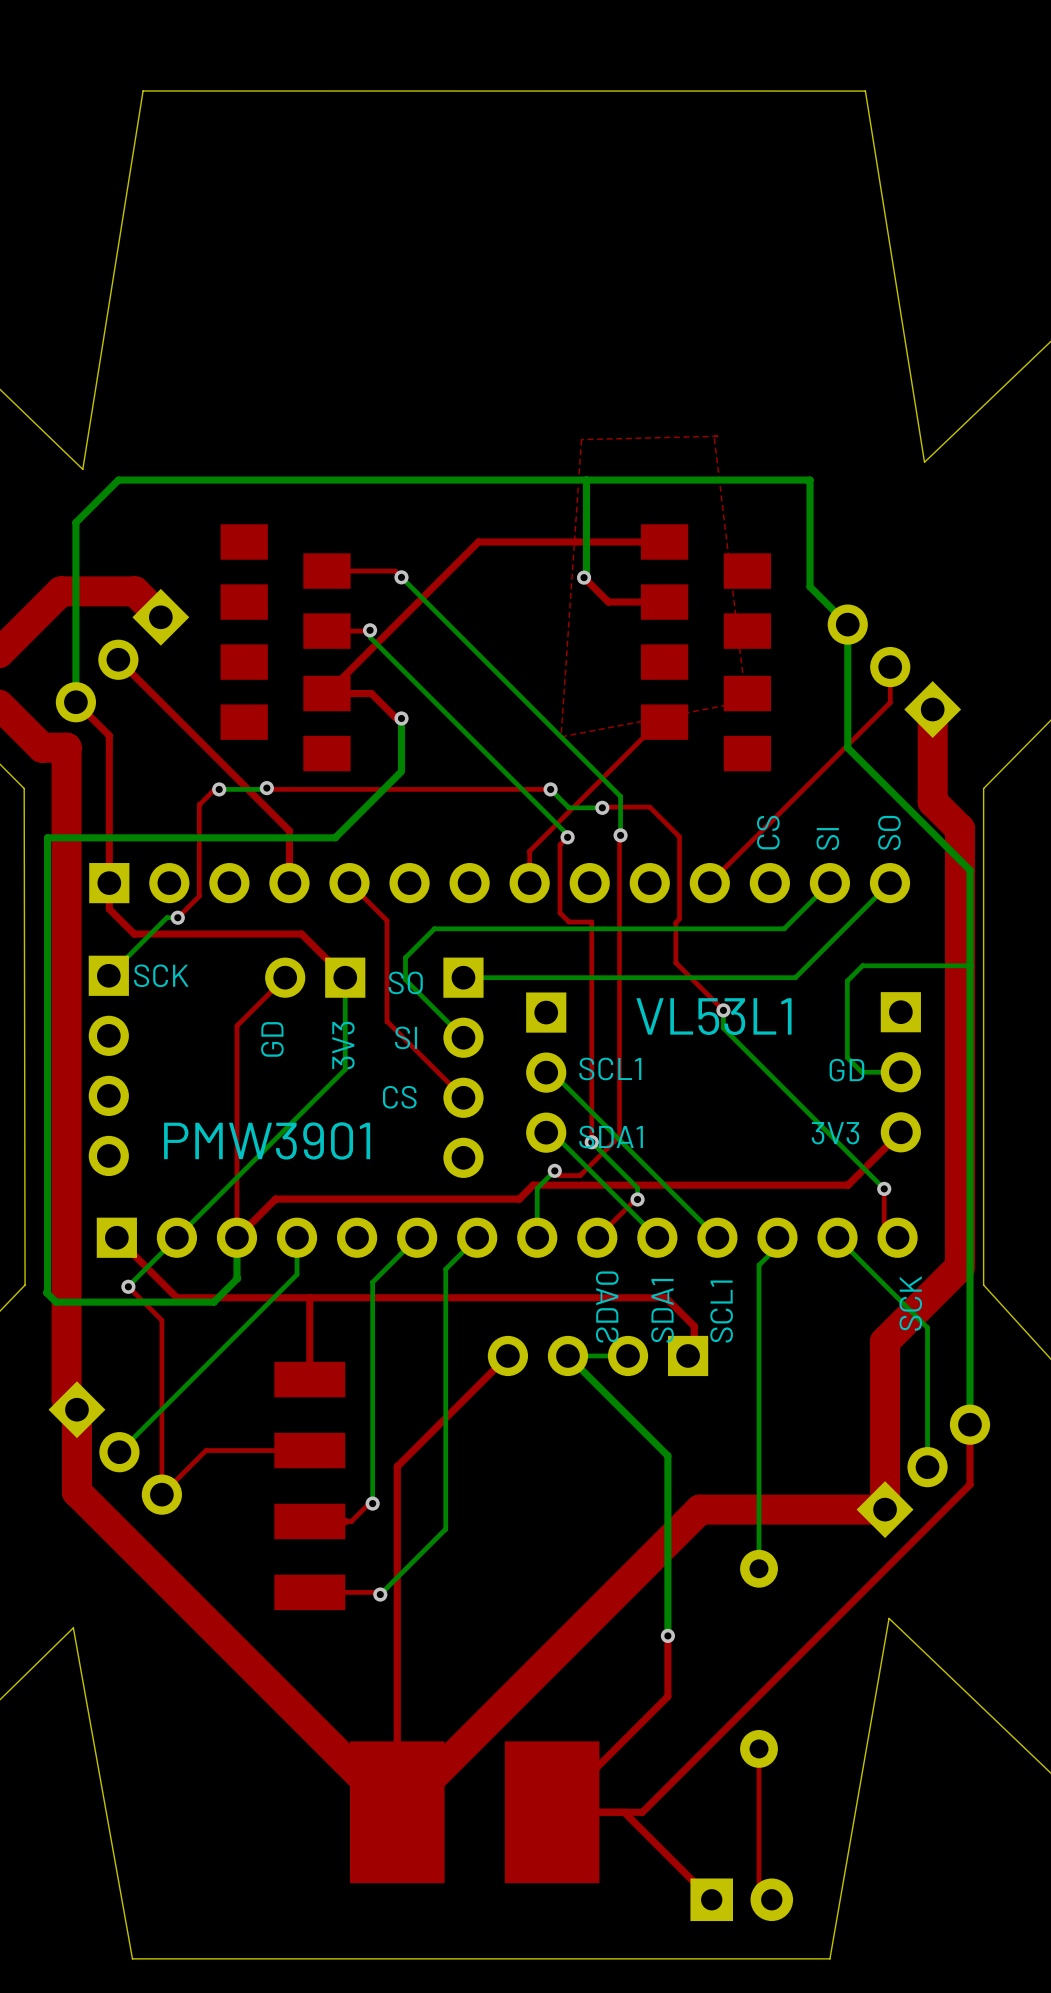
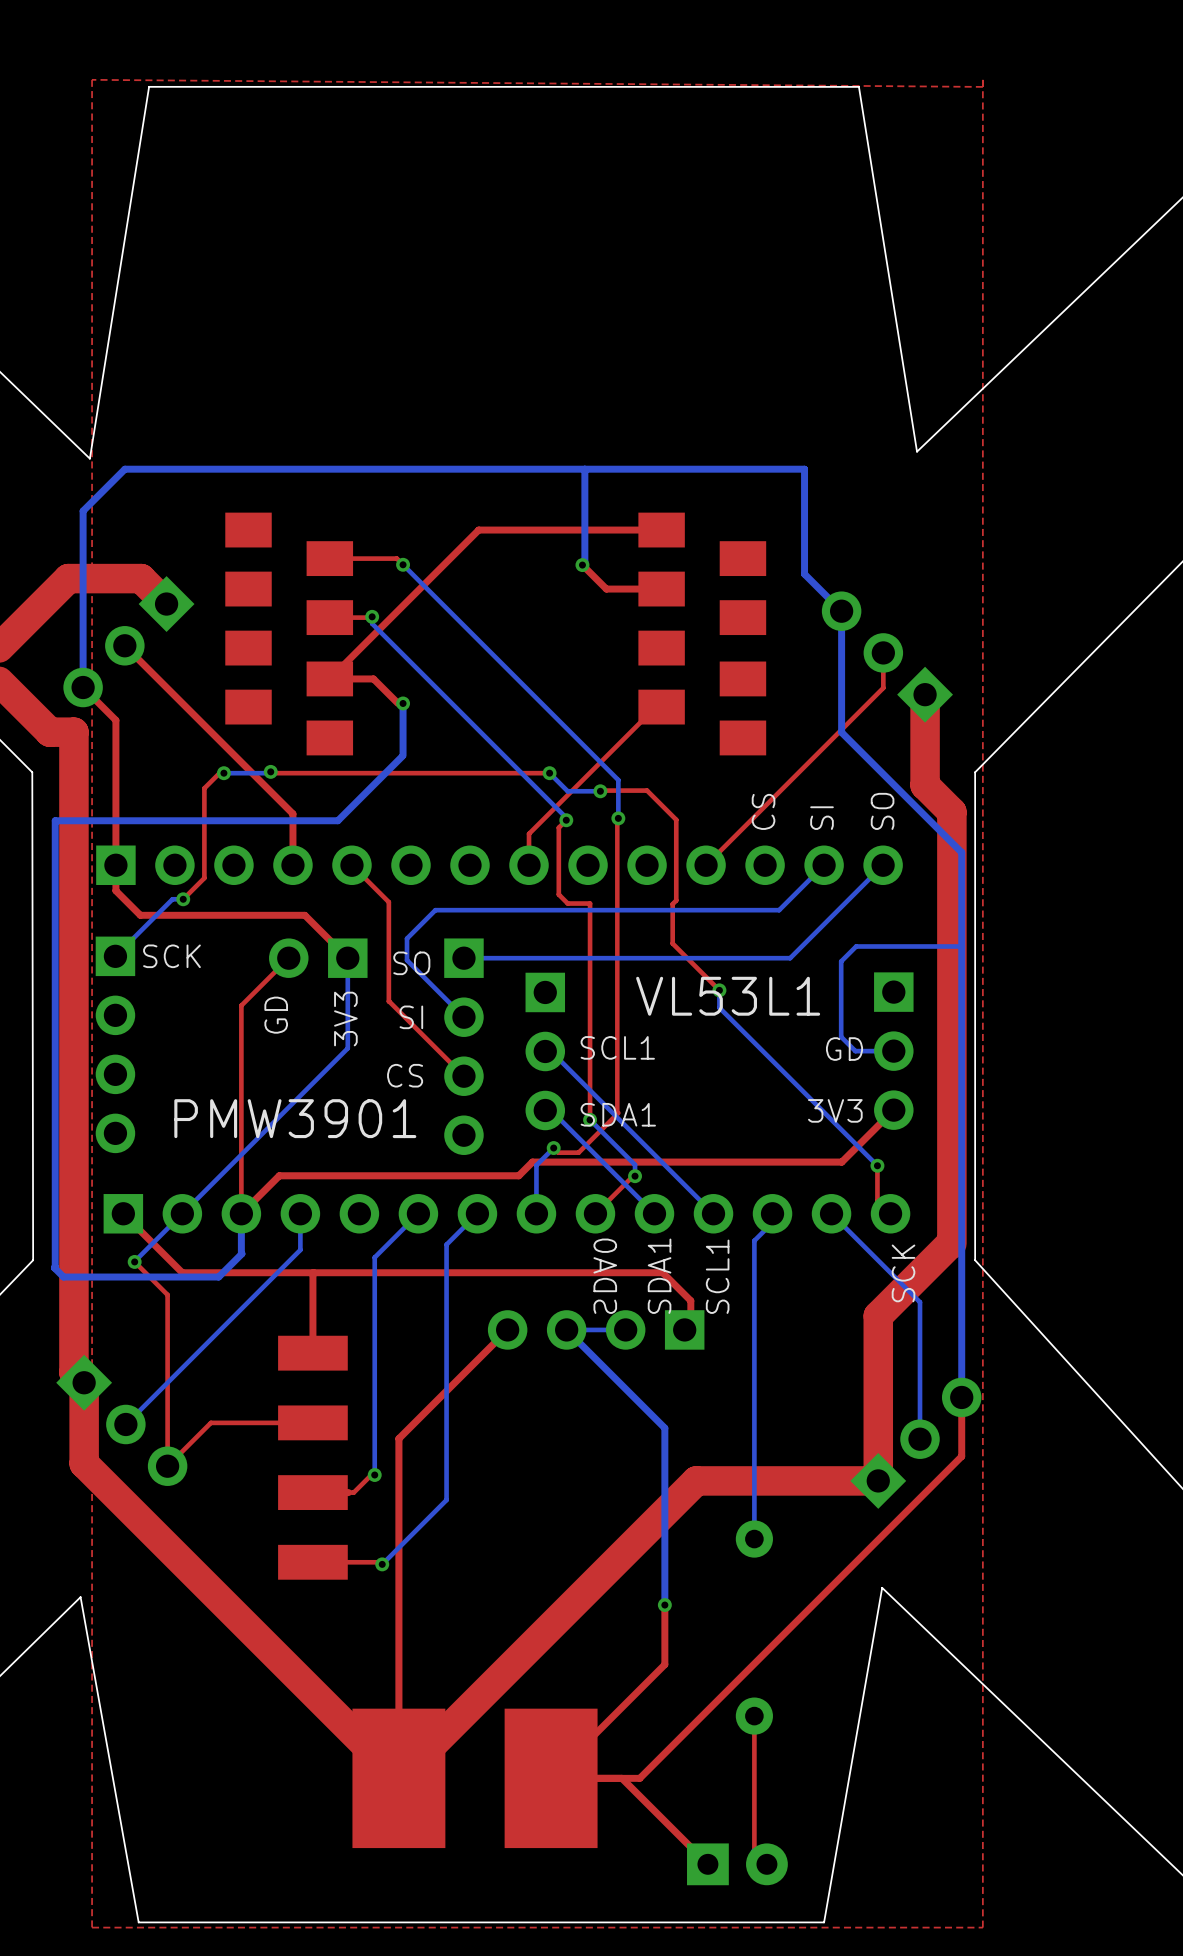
top zone outline: none -> (982, 79) (982, 1927) (92, 1927) (92, 79) (982, 86)
top zone outline: (718, 436) (581, 439) (561, 736) (746, 701) (714, 436) (718, 436) -> none

